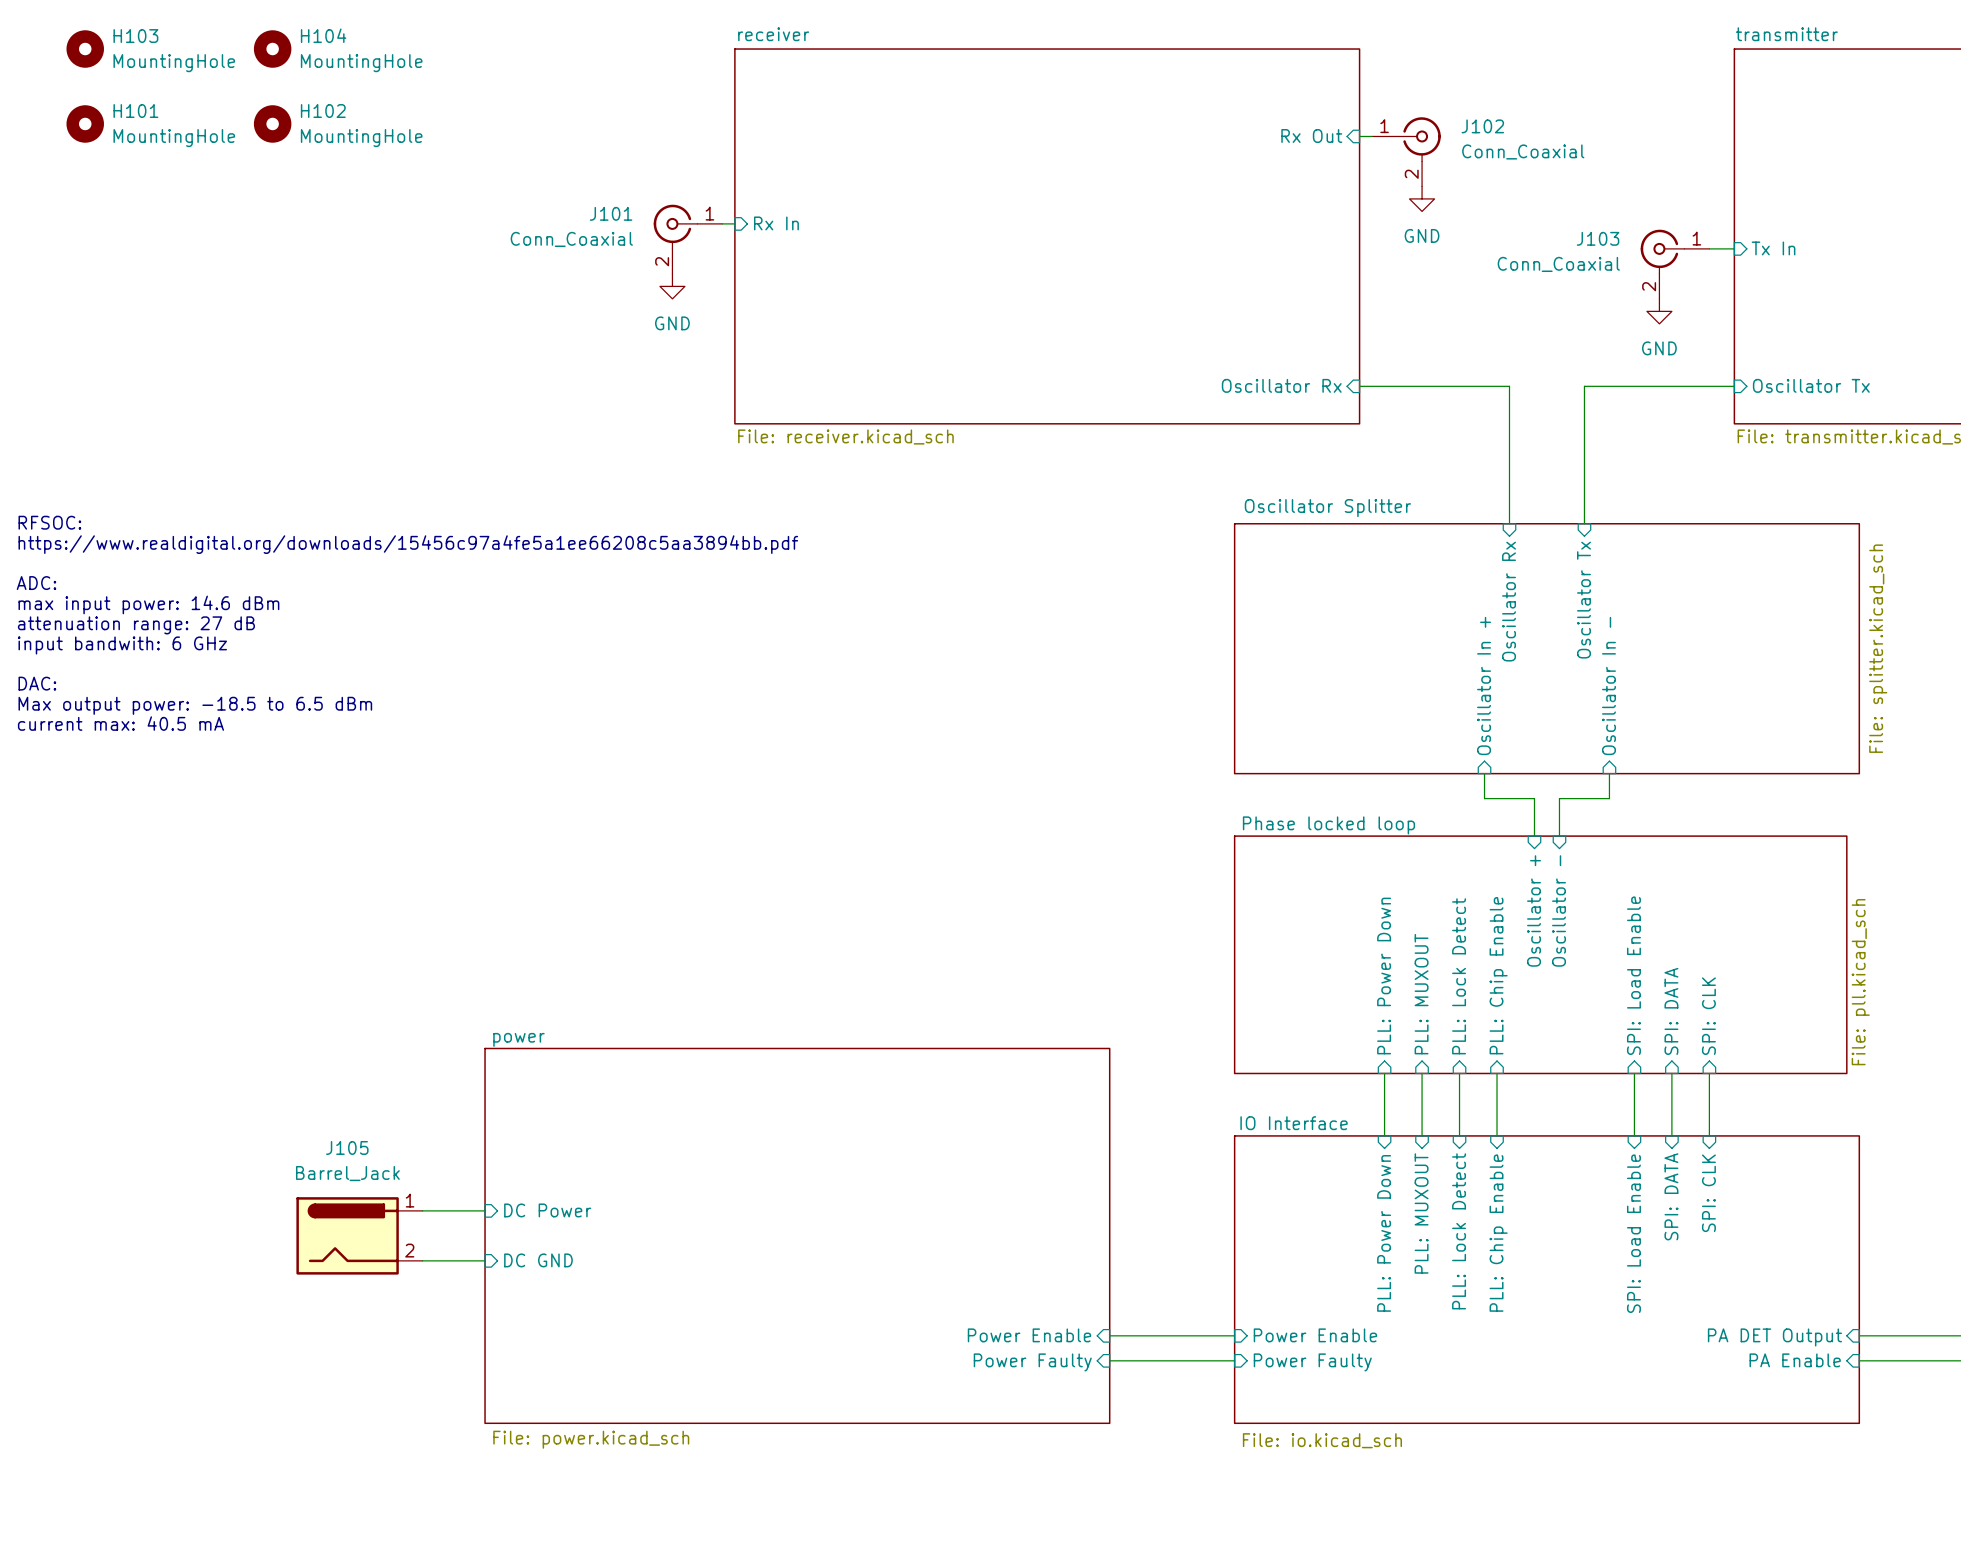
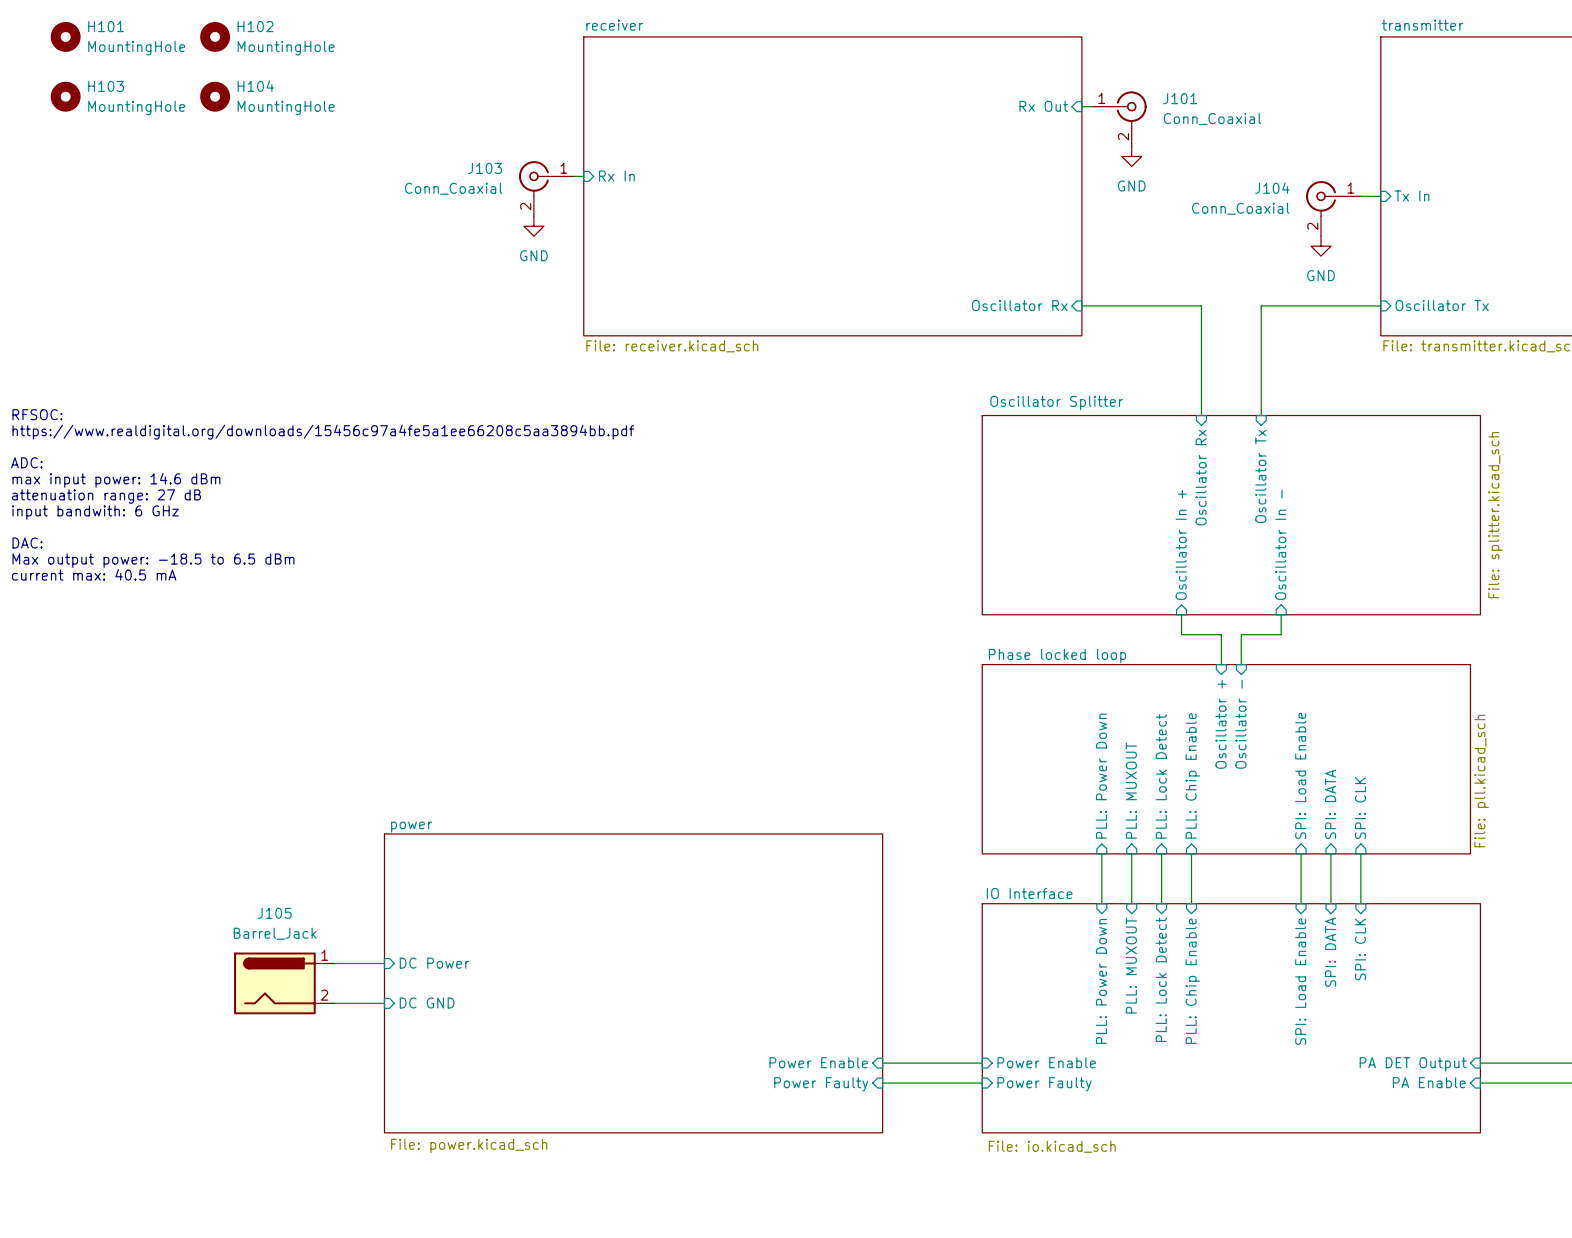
H104 name: H104 (323, 35) -> H102 (255, 26)
H103 name: H103 (135, 36) -> H101 (106, 26)
H101 name: H101 (135, 111) -> H103 (106, 86)
H102 name: H102 (323, 111) -> H104 (255, 86)
J102 name: J102 (1482, 126) -> J101 (1180, 98)
J101 name: J101 (611, 213) -> J103 (484, 168)
J103 name: J103 (1598, 238) -> J104 (1272, 188)

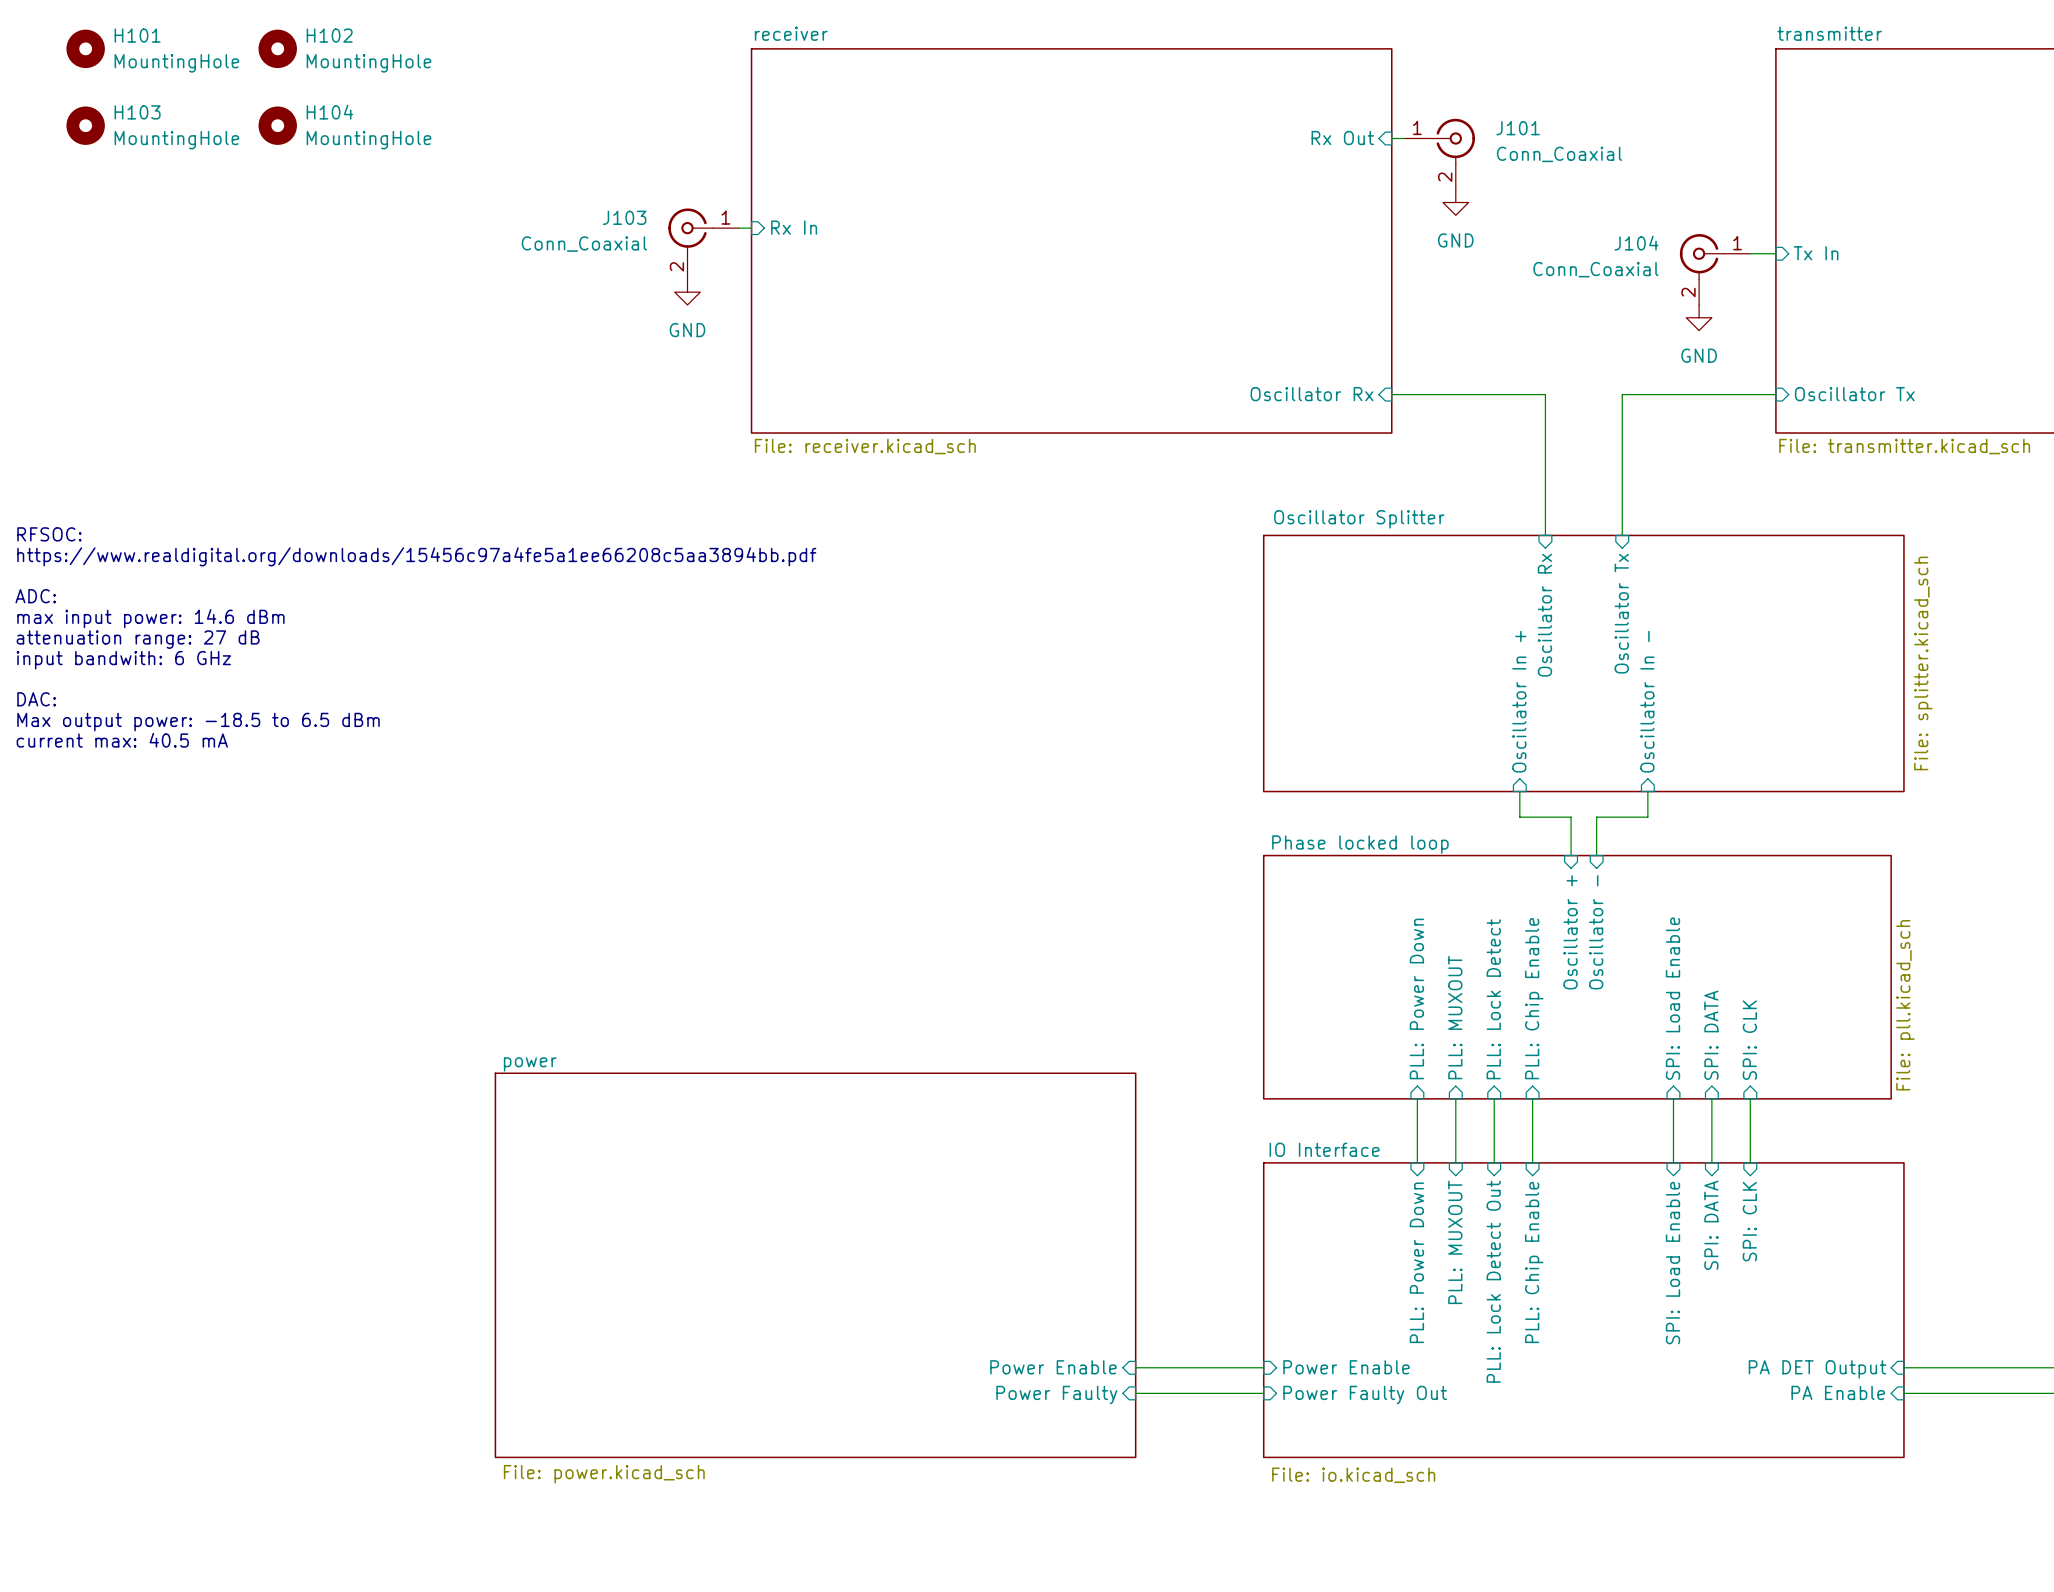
wire: (334, 963) (384, 963) -> none
sheet pin: DC Power (434, 963) -> none
sheet pin: PLL: Lock Detect (1161, 979) -> PLL: Lock Detect Out (1493, 1281)
J105: Barrel_Jack (284, 983) -> none
sheet pin: DC GND (427, 1002) -> none
wire: (334, 1003) (384, 1003) -> none
sheet pin: Power Faulty (1044, 1084) -> Power Faulty Out (1365, 1395)

